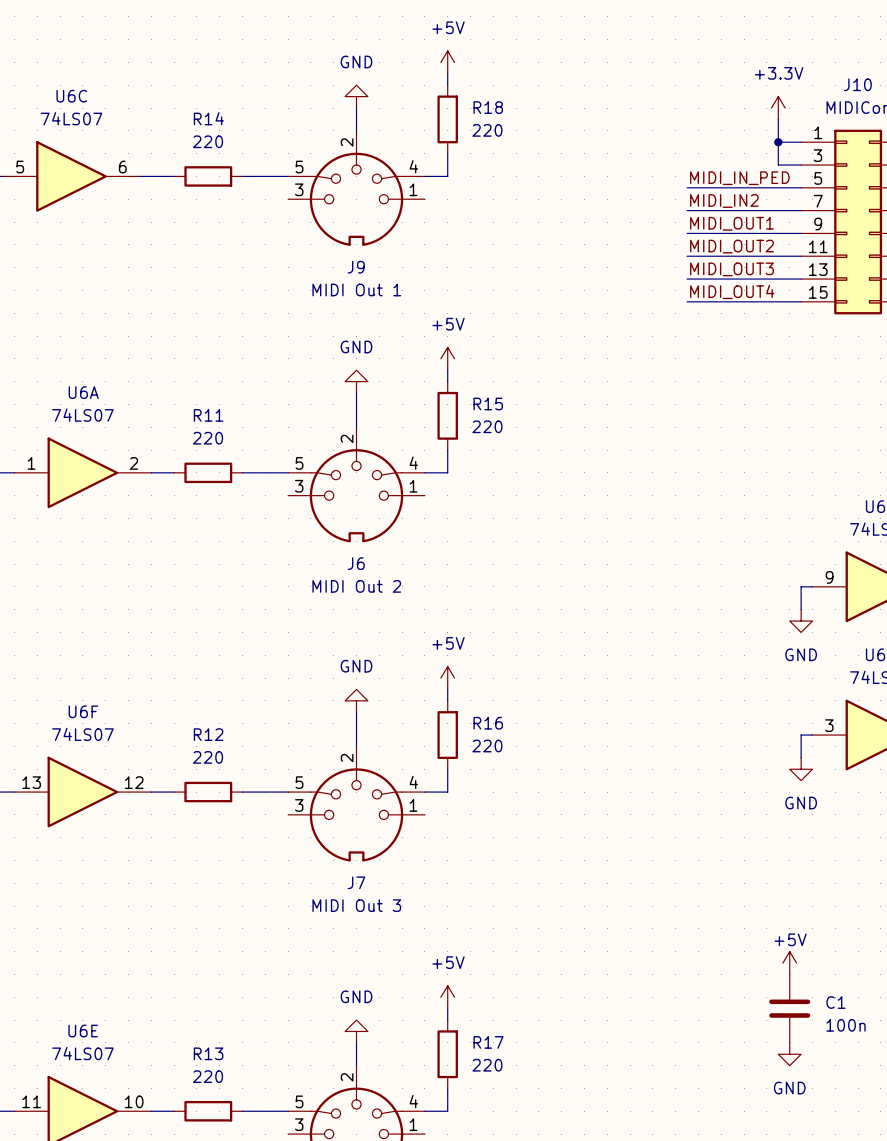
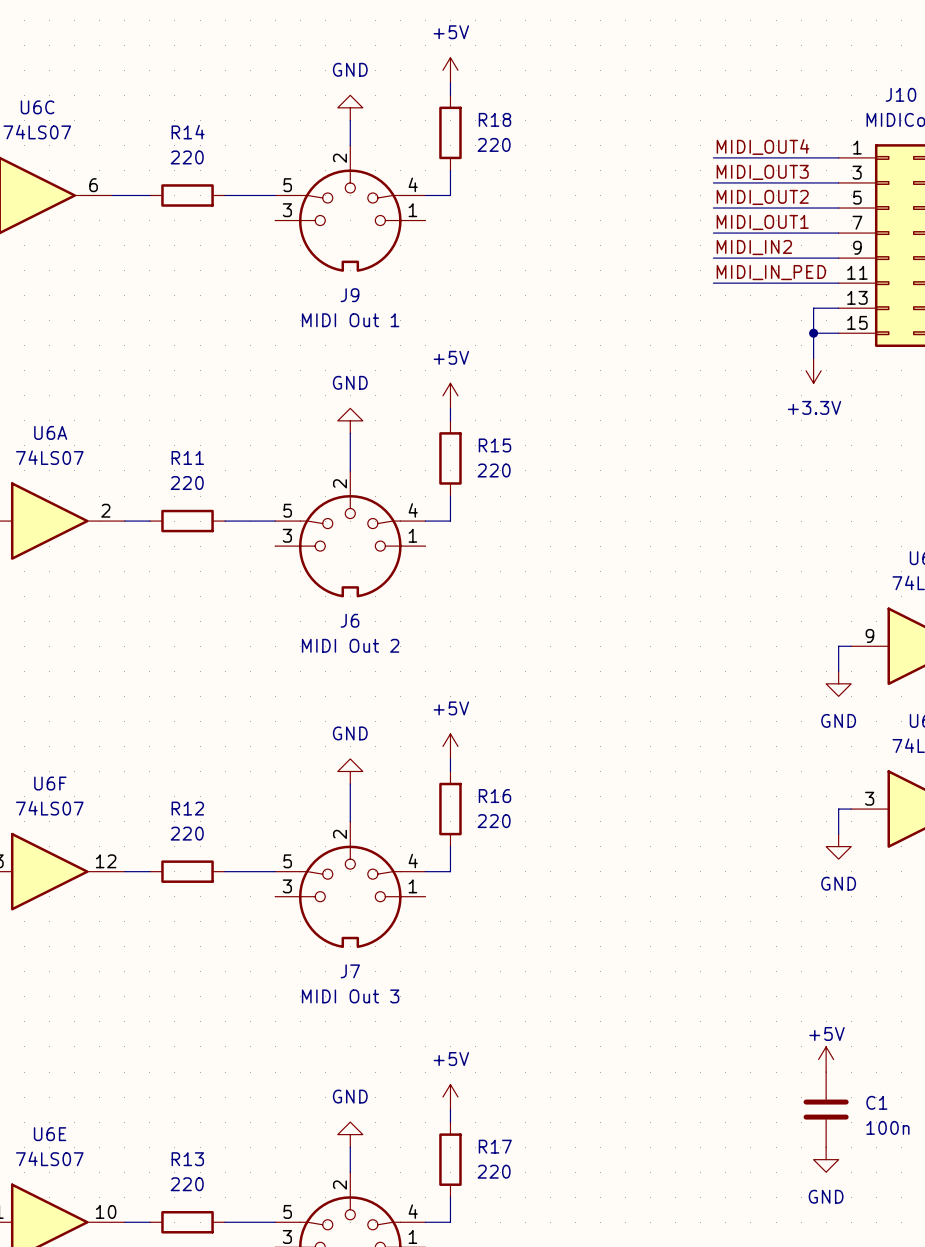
power symbol: +3.3V (778, 108) -> none
wire: (778, 119) (778, 165) -> (713, 182) (813, 182)
junction: (778, 142) -> none
label: MIDI_IN_PED (739, 178) -> MIDI_OUT2 (762, 197)
label: MIDI_IN2 (724, 200) -> MIDI_OUT1 (762, 222)
label: MIDI_OUT1 (731, 223) -> MIDI_IN2 (754, 247)
label: MIDI_OUT2 (731, 246) -> MIDI_IN_PED (771, 272)
label position: MIDI_OUT3 (731, 269) -> MIDI_OUT3 (762, 172)
wire: (687, 279) (778, 279) -> (813, 358) (813, 308)
label position: MIDI_OUT4 (732, 291) -> MIDI_OUT4 (763, 147)
wire: (687, 301) (778, 301) -> (713, 157) (813, 157)
junction: none -> (813, 333)
power symbol: none -> +3.3V (813, 370)

